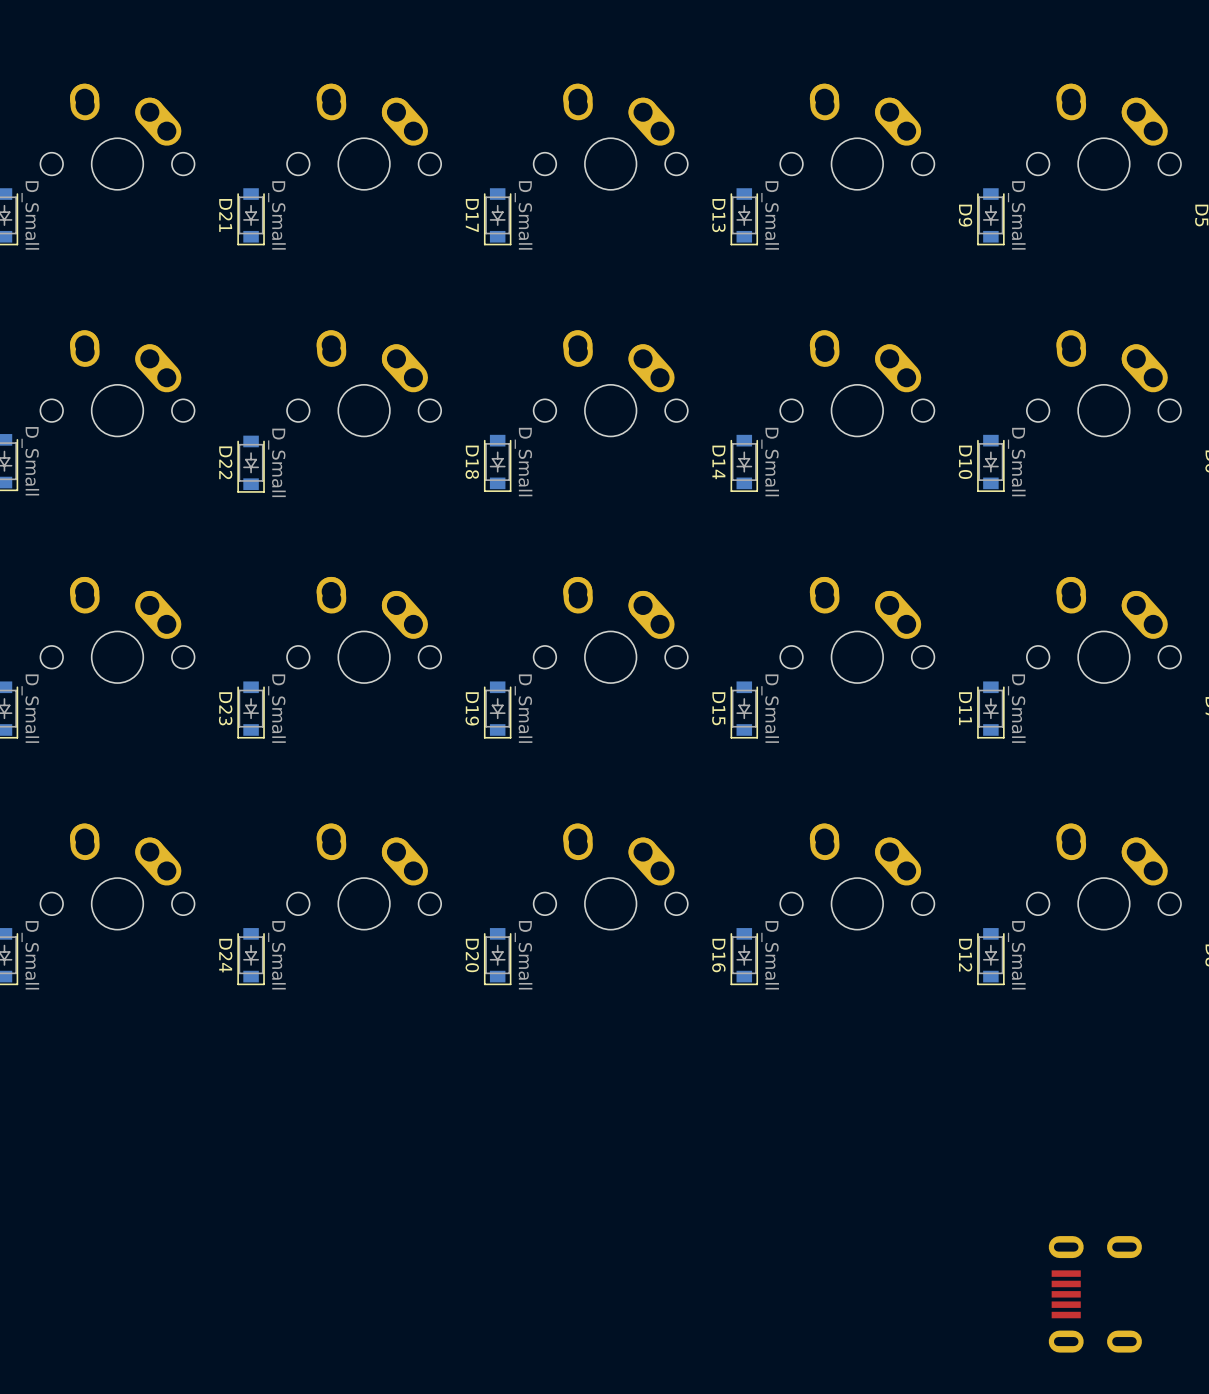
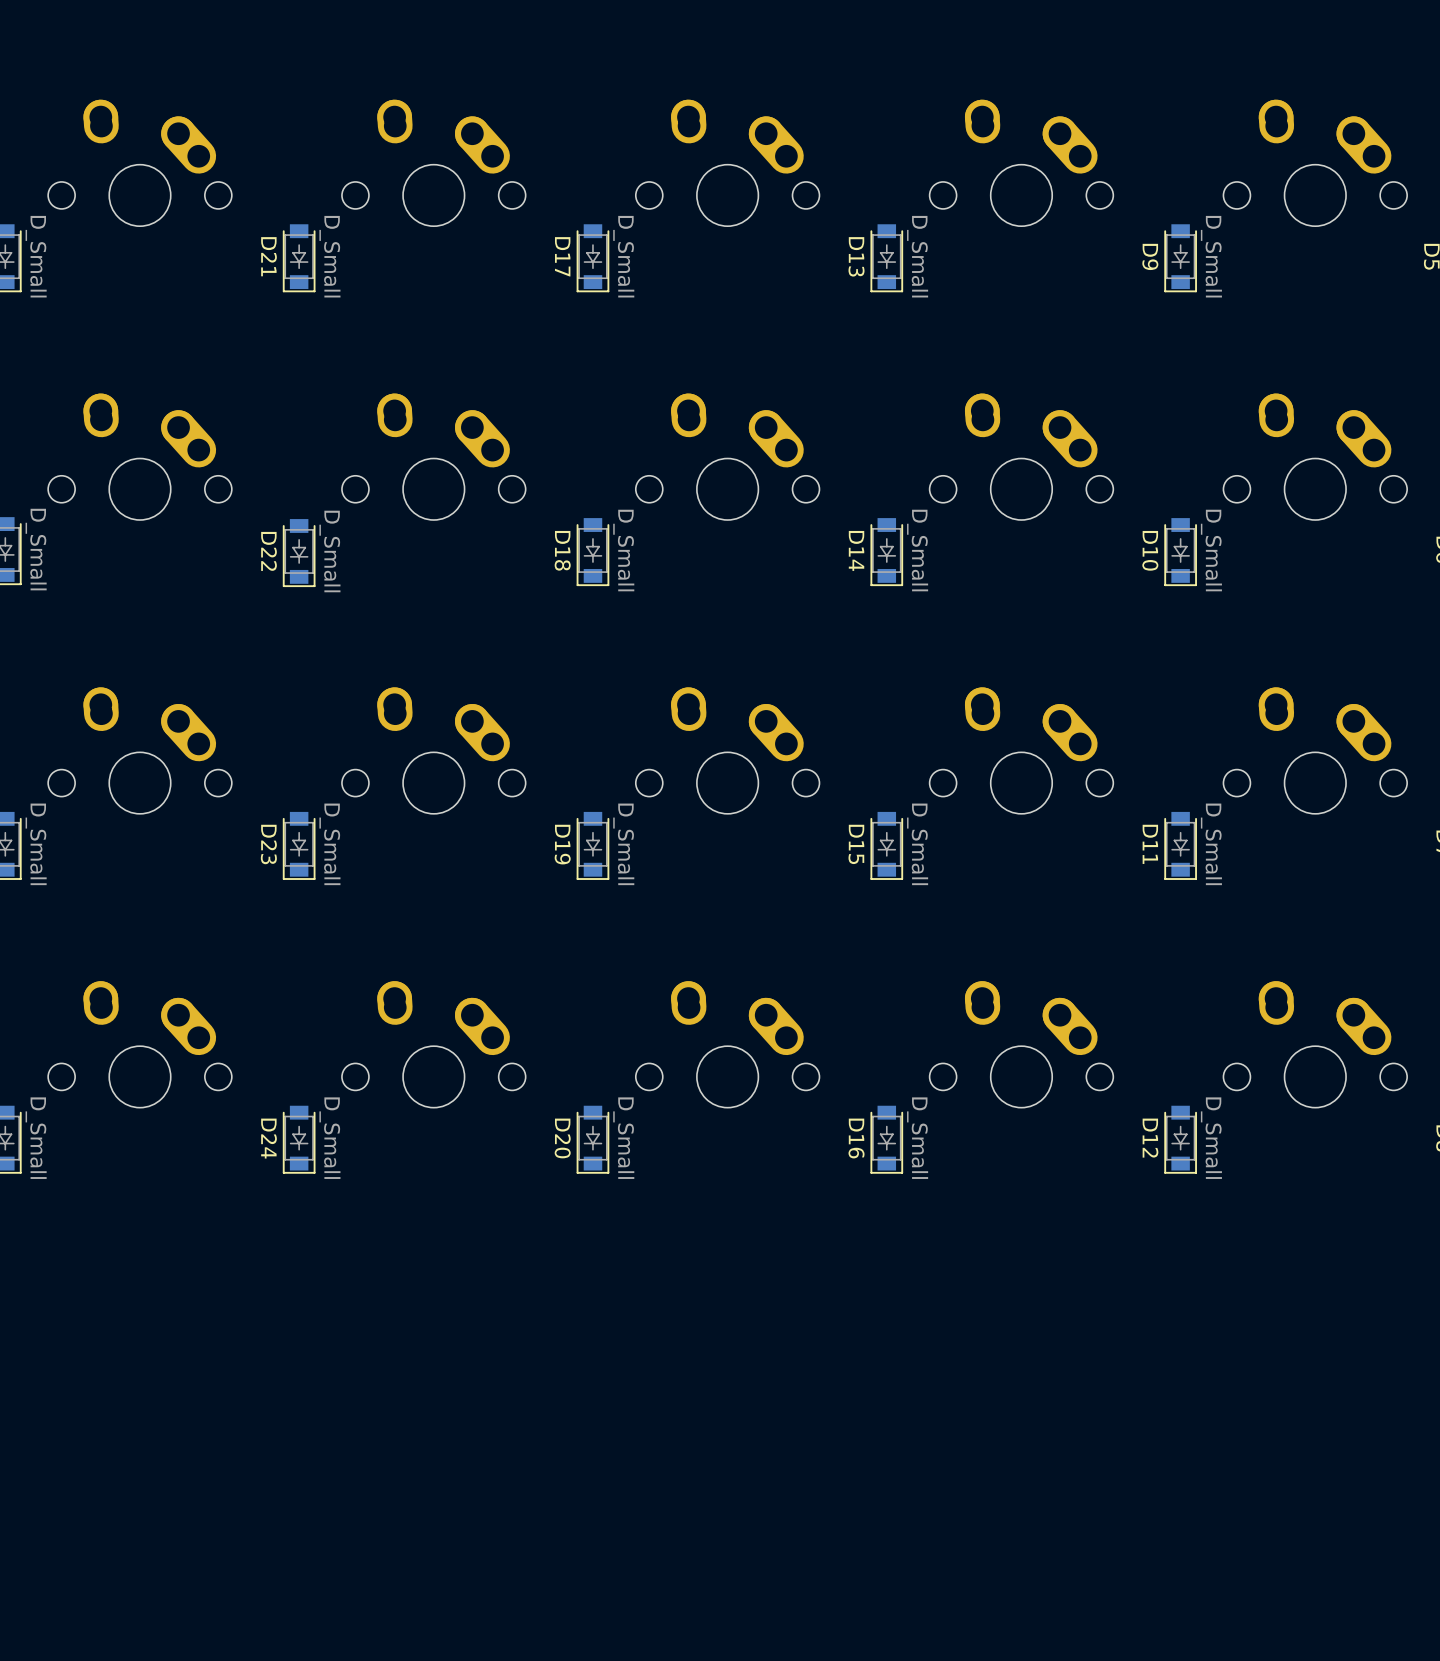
part: (1095, 1294) -> none

